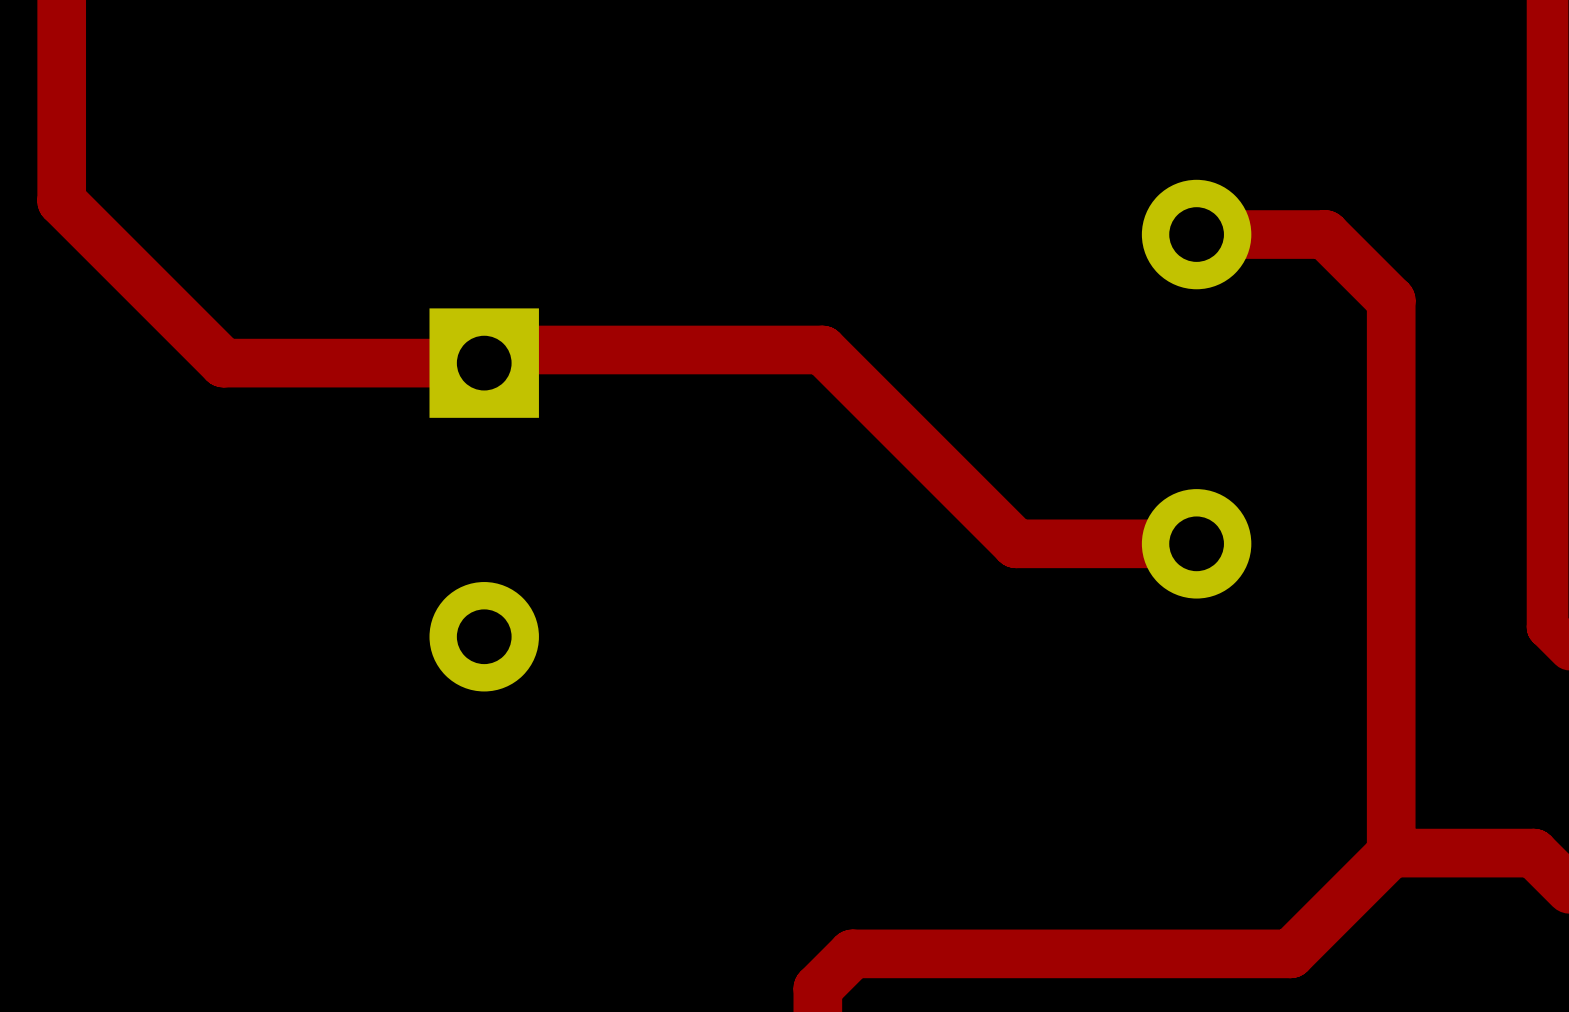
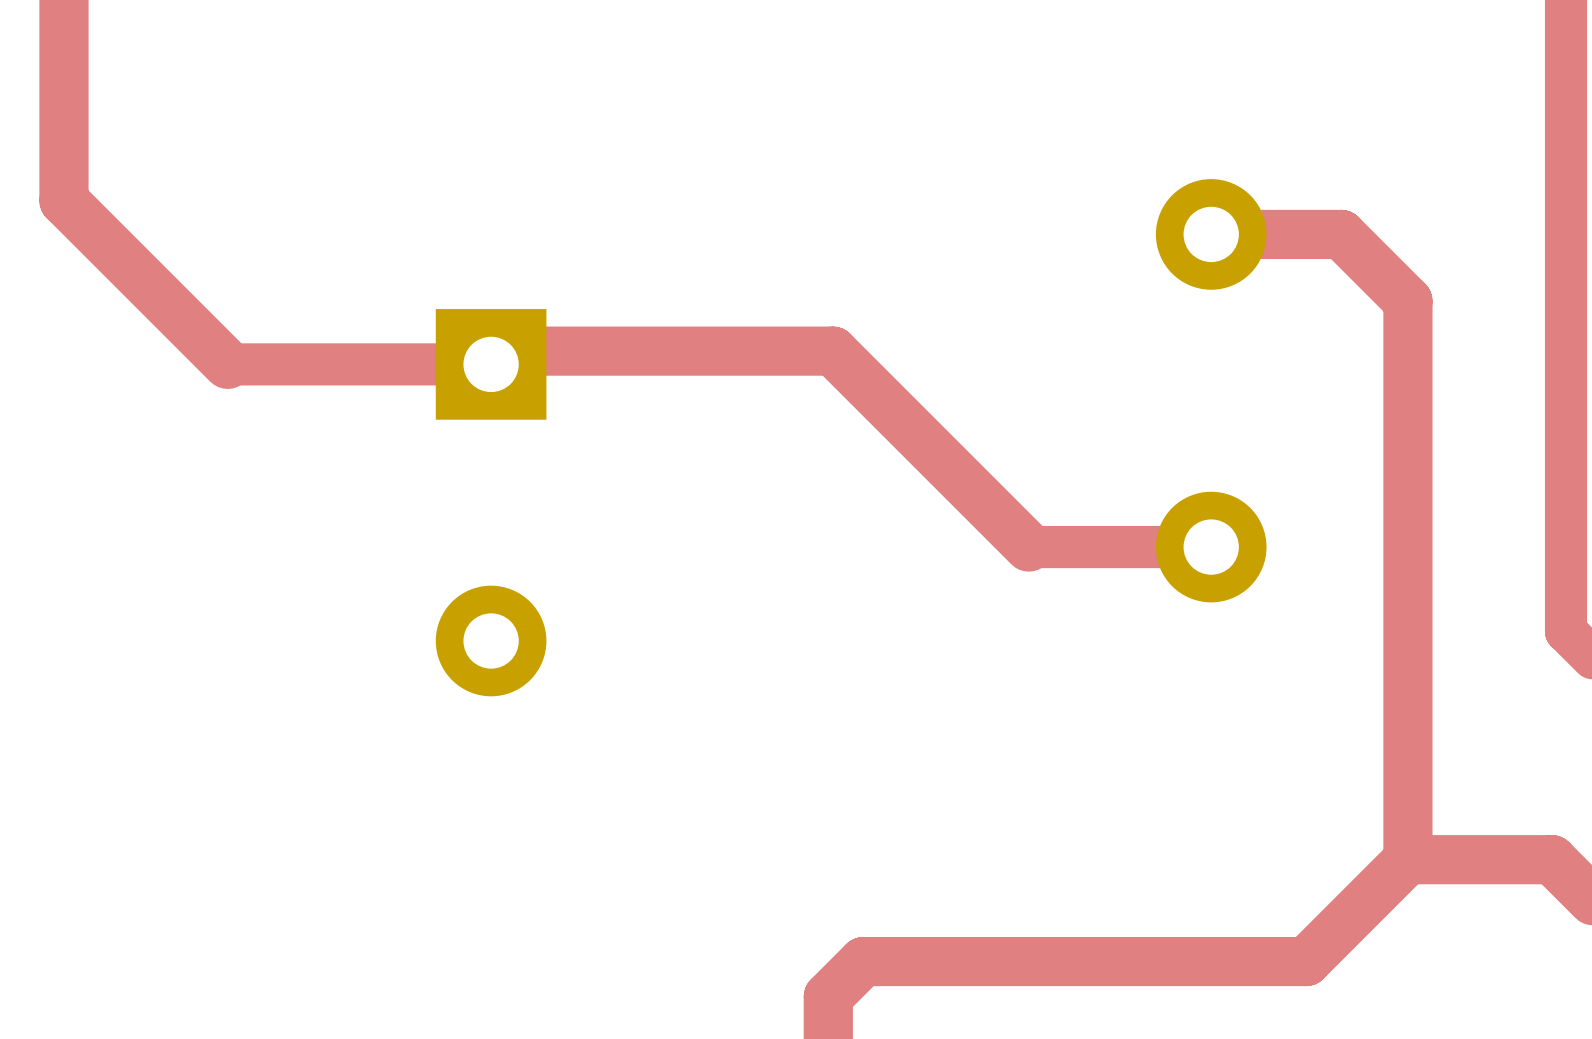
top track width: thick (484, 363) (223, 363) -> thin (491, 364) (227, 364)
top track width: thick (1196, 543) (1016, 543) -> thin (1211, 547) (1028, 547)

